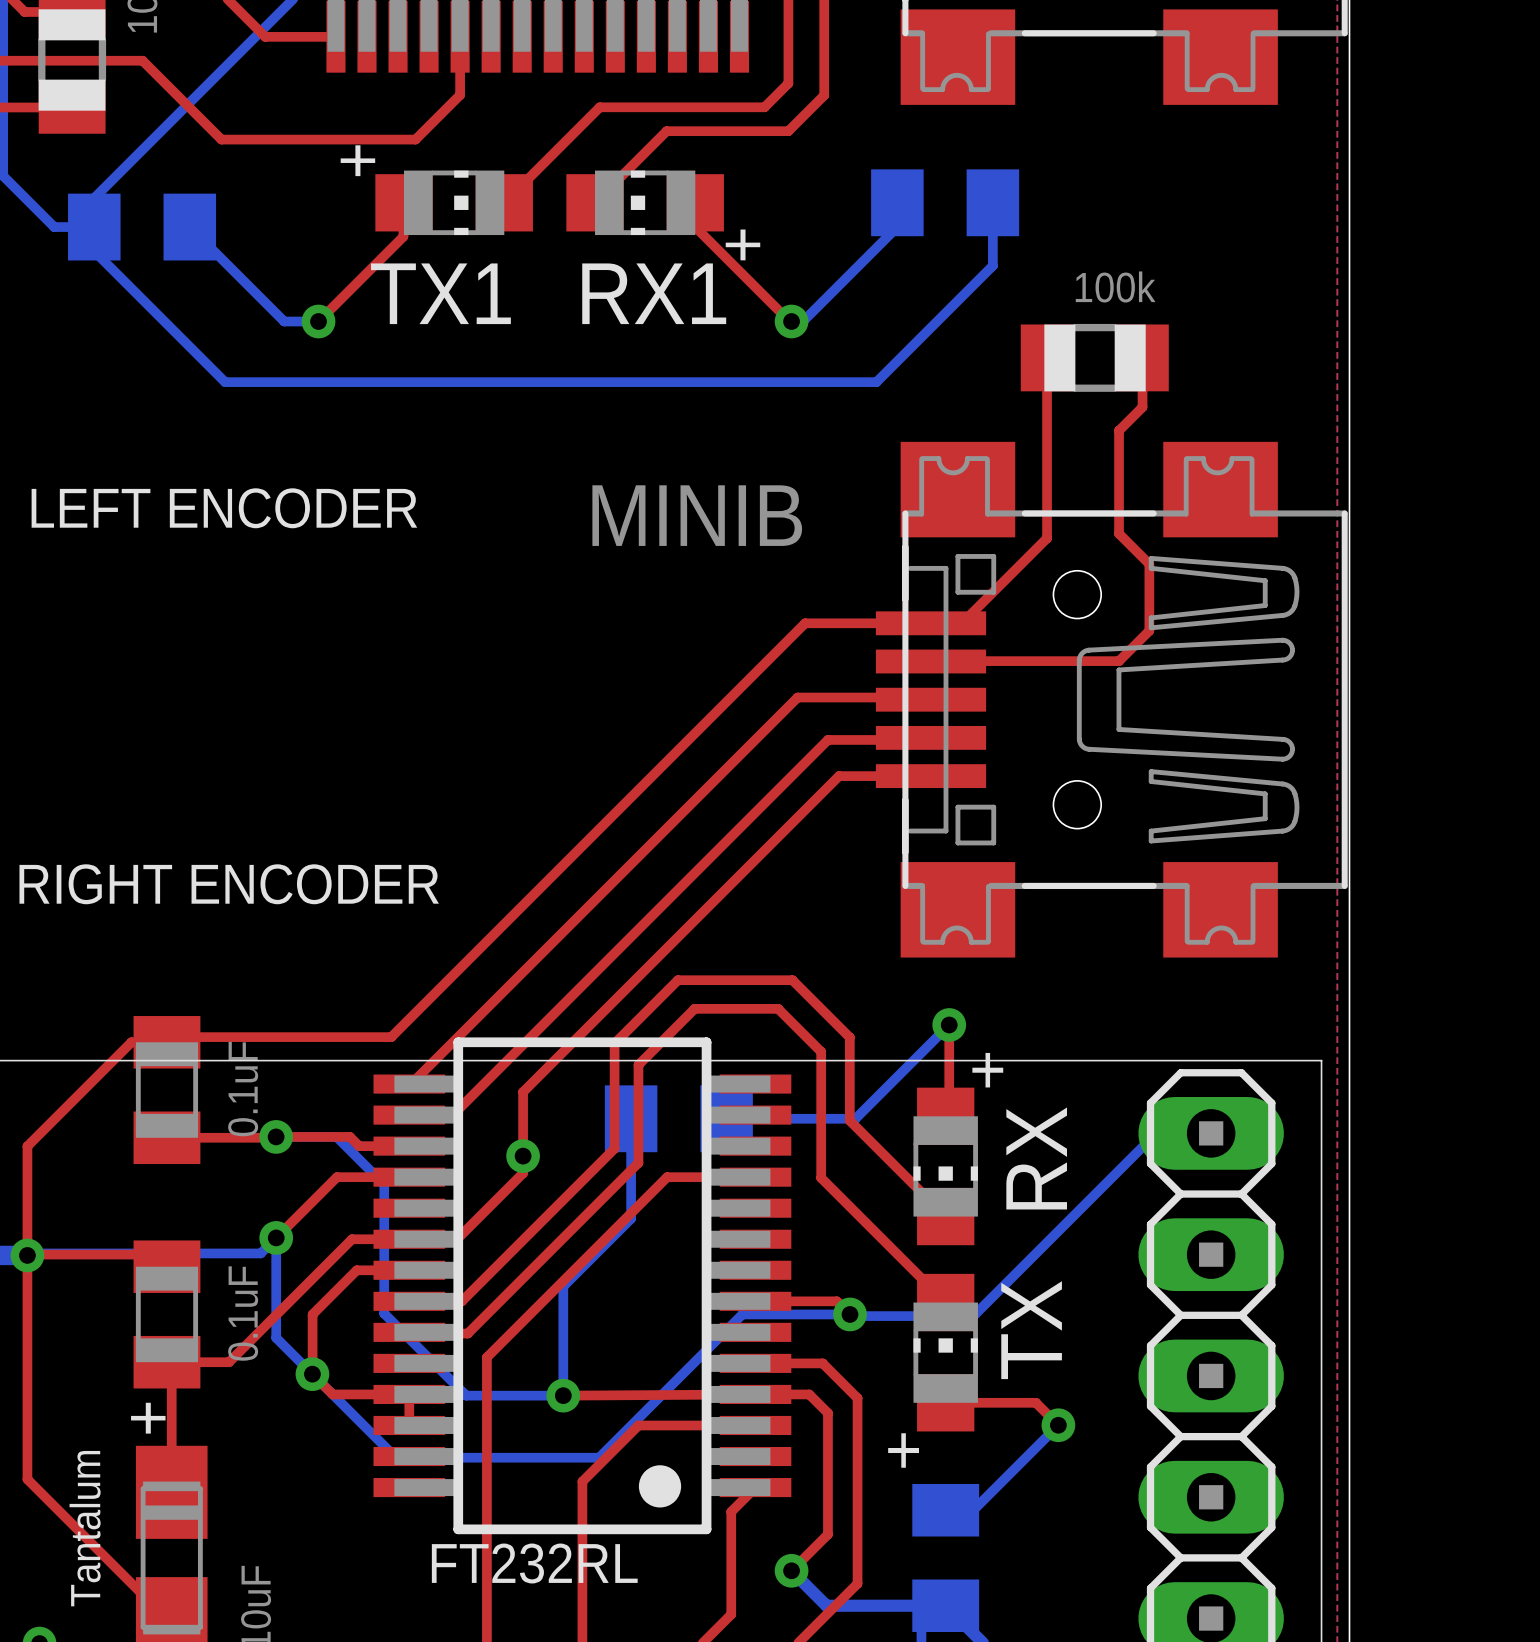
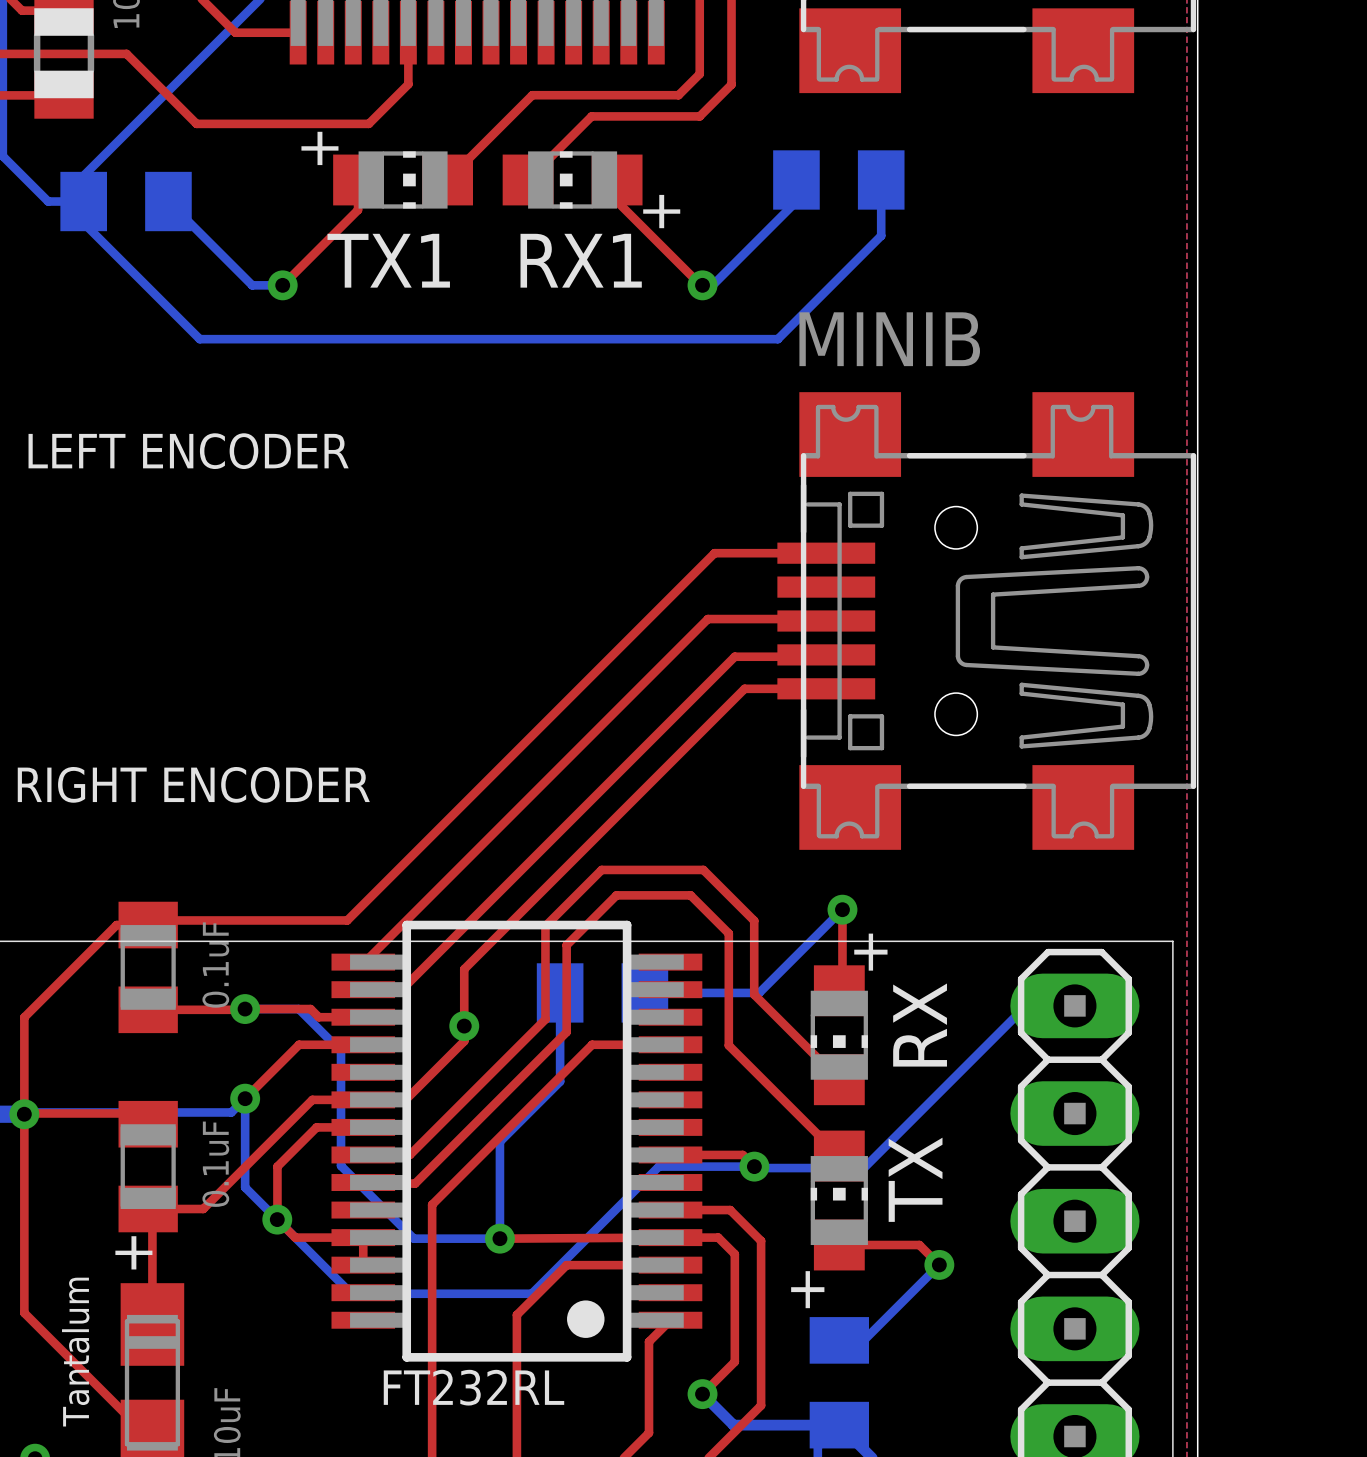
top track: (1047, 357) (1047, 538) (966, 618) (935, 618) (931, 623) -> none
part: 100k (1094, 357) -> none
top track: (1142, 357) (1142, 407) (1119, 430) (1119, 533) (1149, 564) (1149, 630) (1119, 661) (931, 661) -> none
part value position: MINIB (697, 515) -> MINIB (889, 339)

